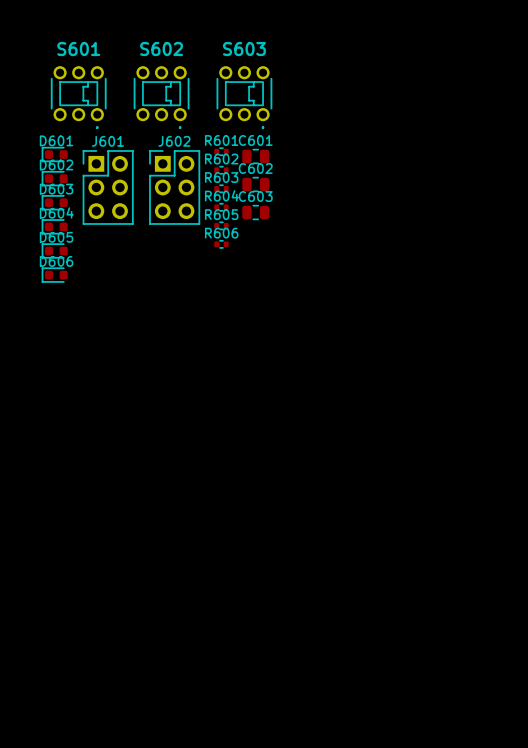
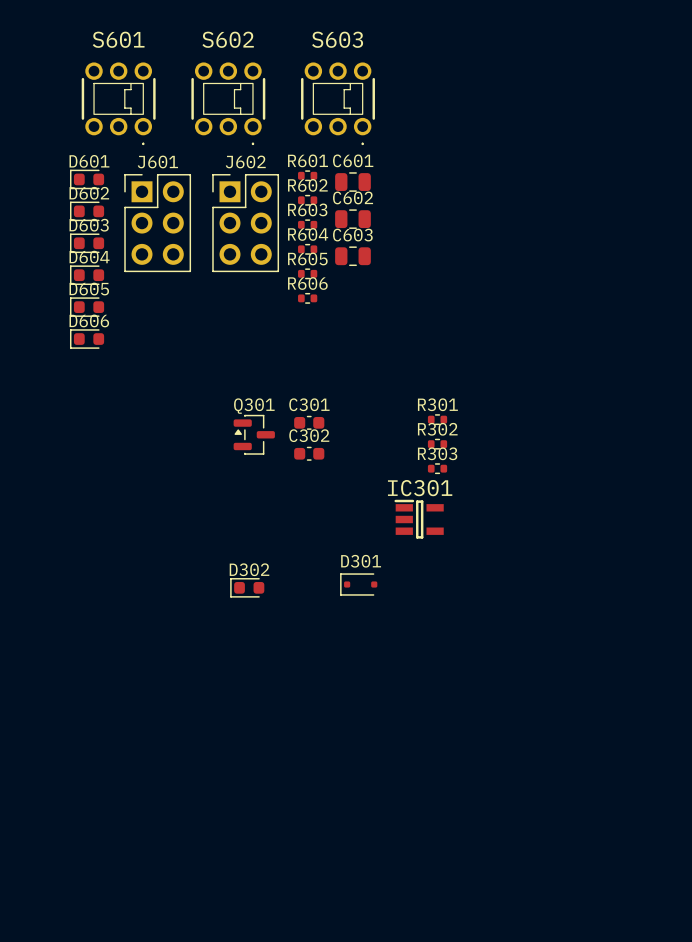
R301: none -> (437, 419)
C301: none -> (309, 422)
Q301: none -> (254, 434)
R302: none -> (437, 444)
C302: none -> (309, 453)
R303: none -> (437, 468)
IC301: none -> (419, 519)
D301: none -> (358, 584)
D302: none -> (247, 587)

